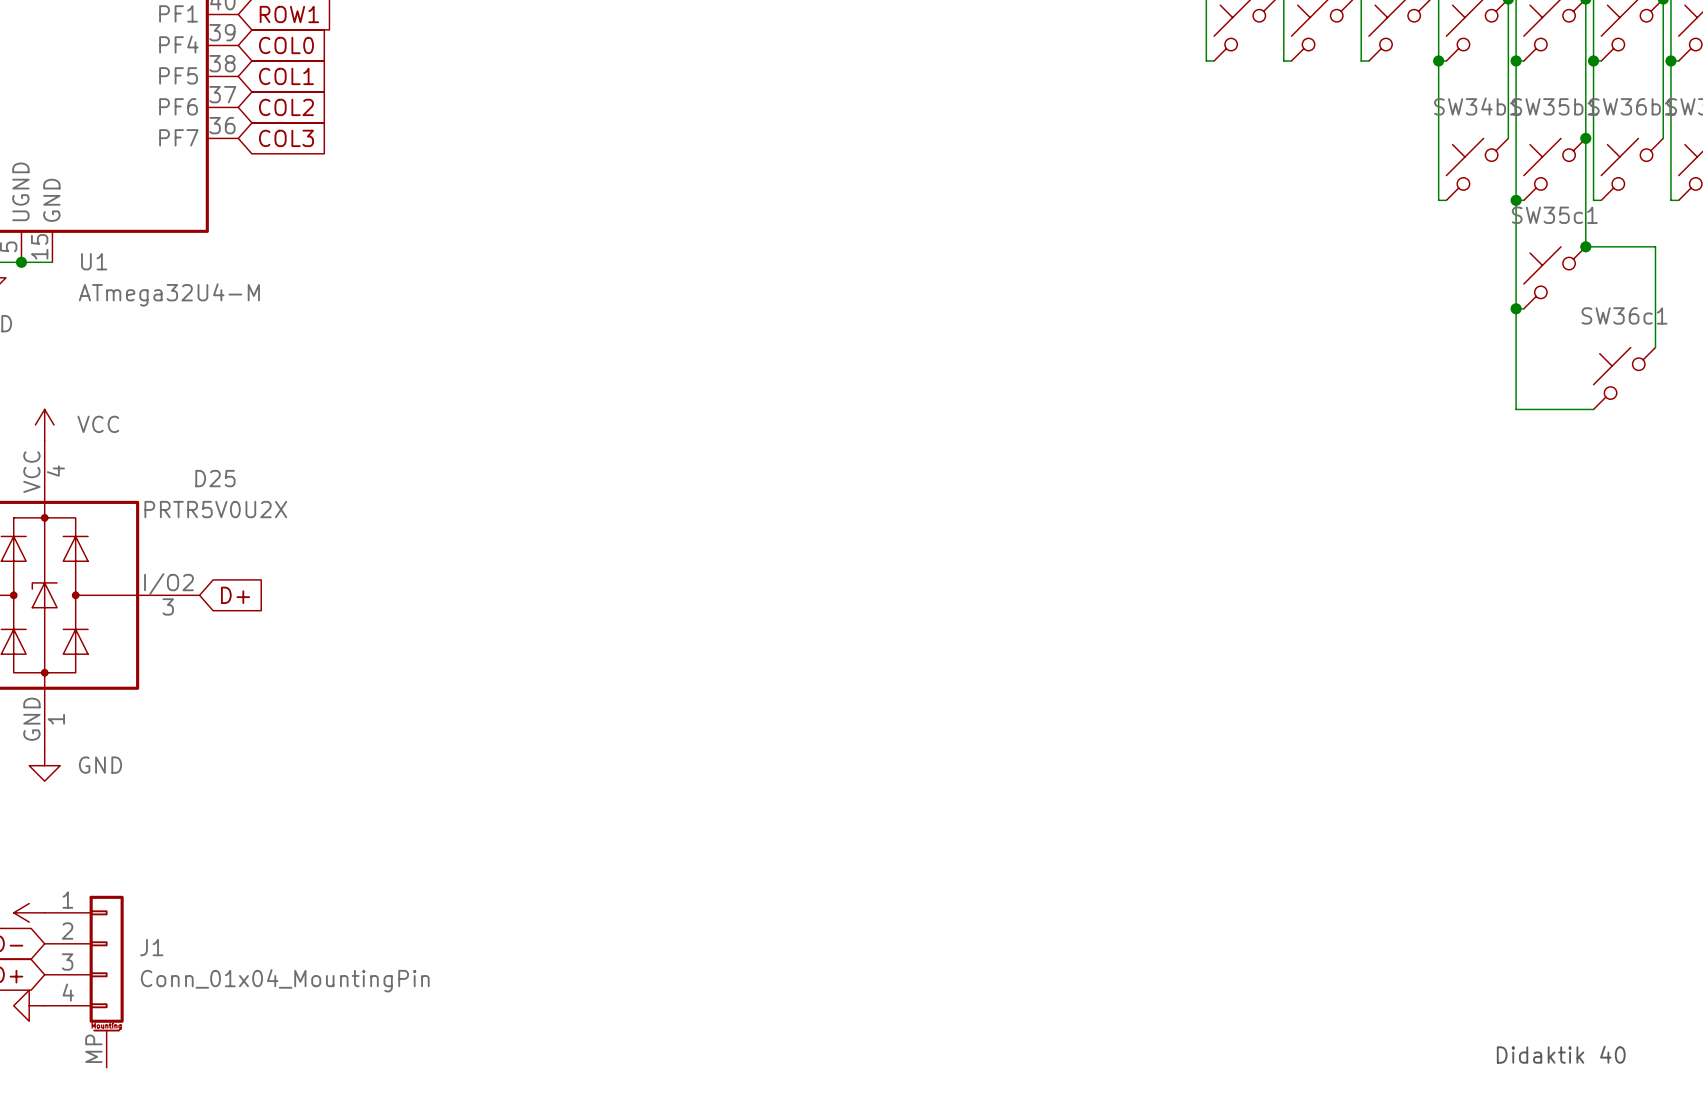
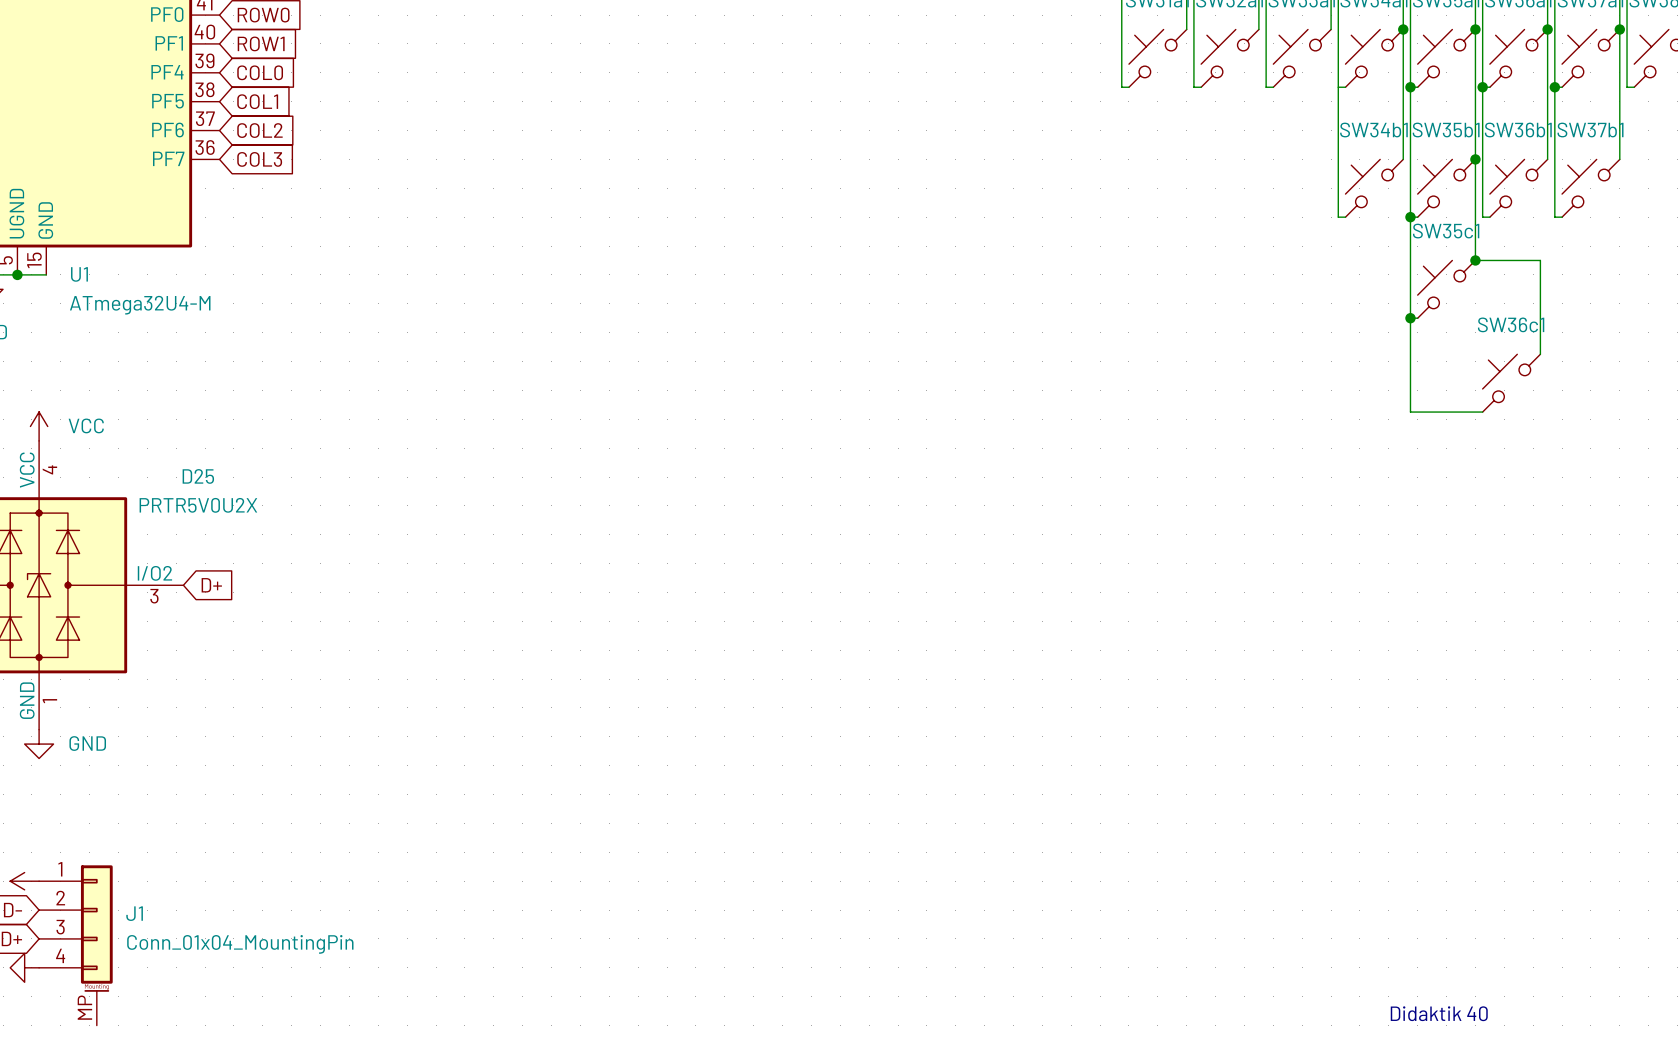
junction: (1438, 60) -> none

